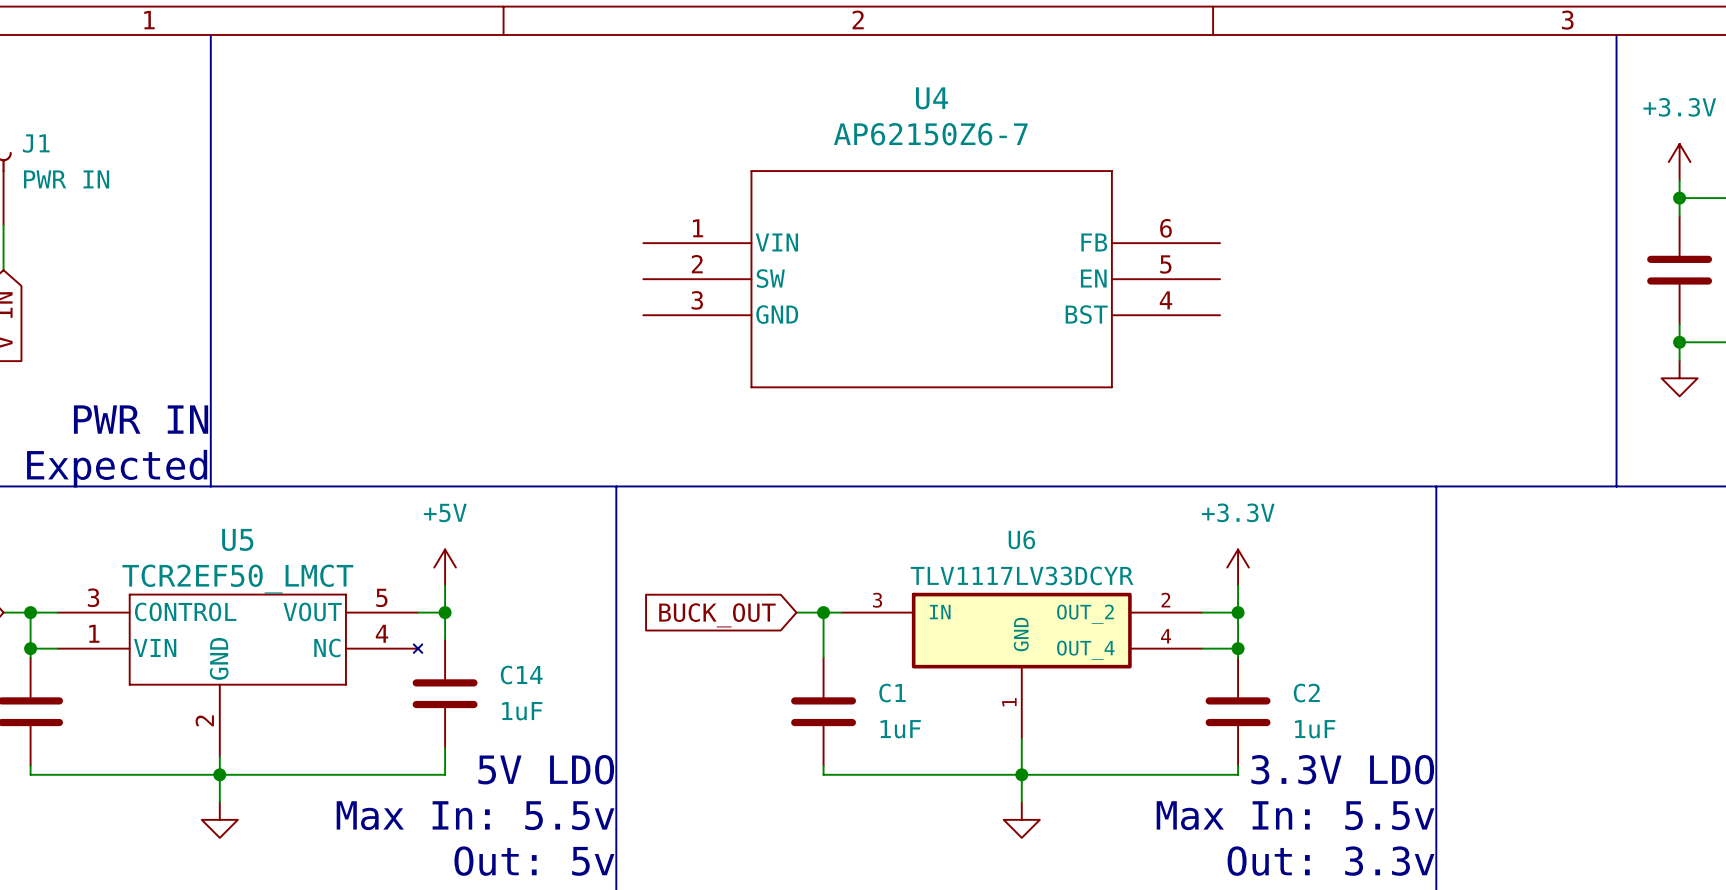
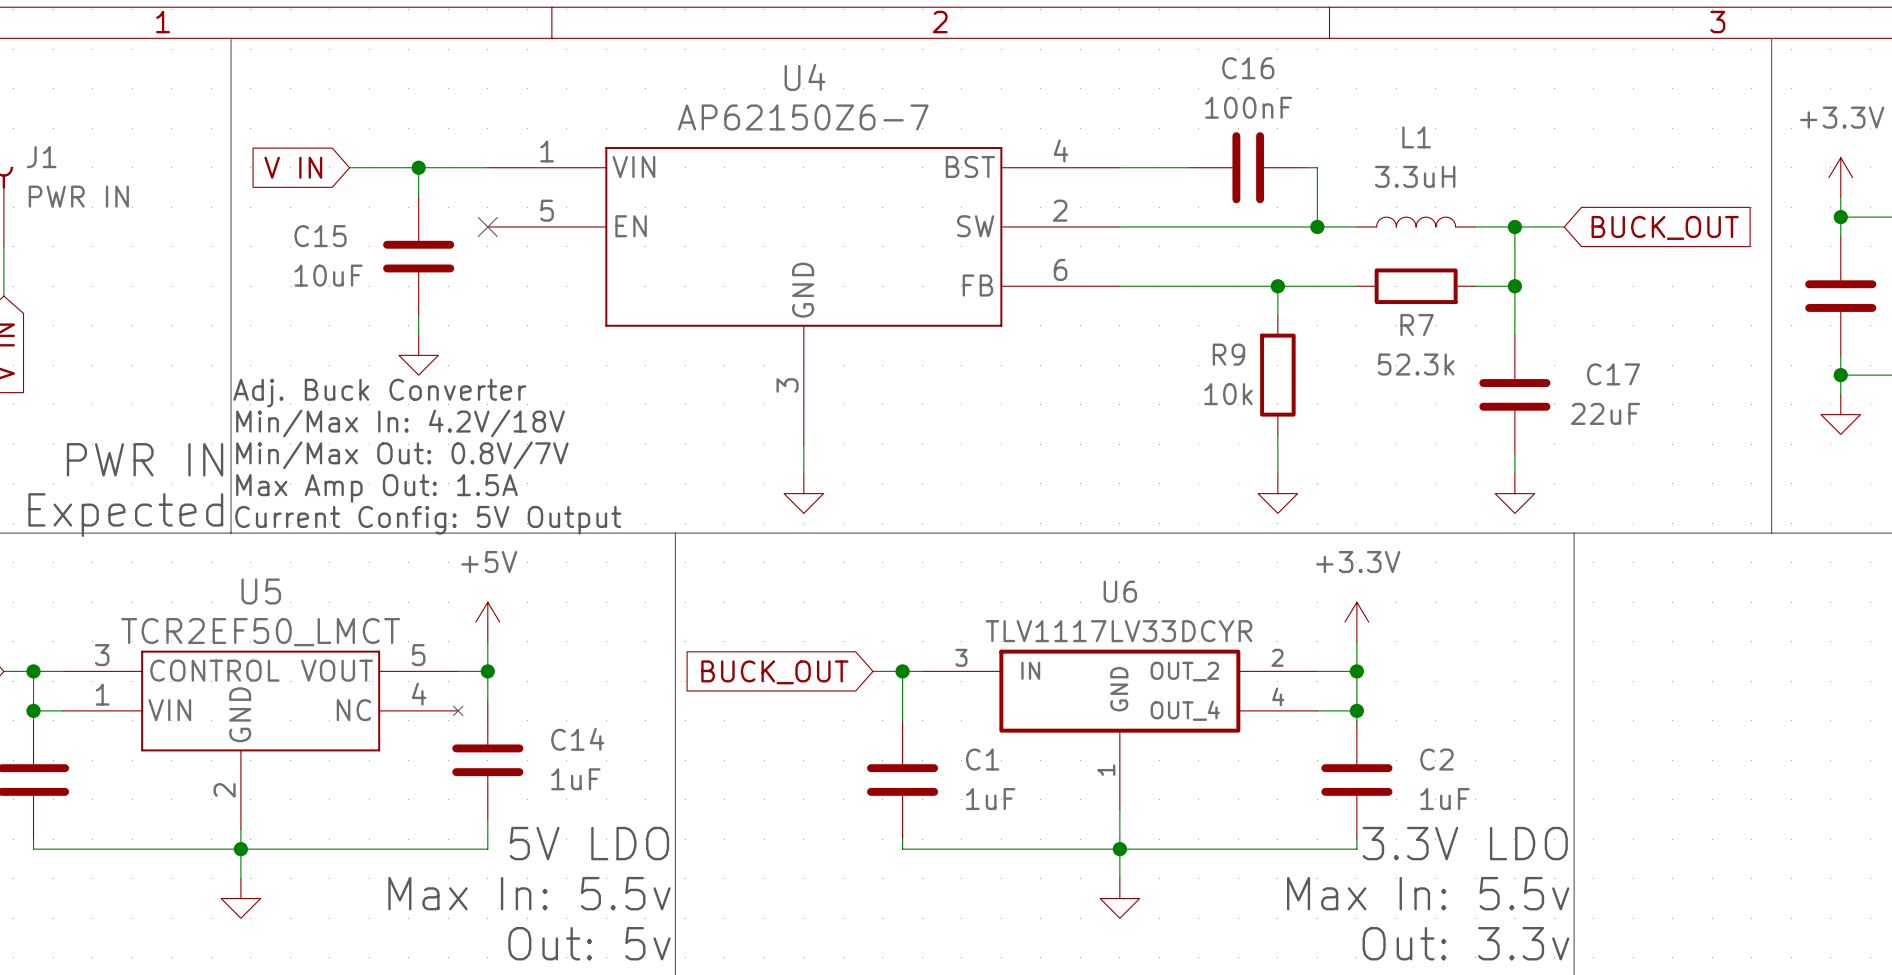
global label: none -> V IN (293, 167)
wire: none -> (349, 167) (487, 167)
wire: none -> (418, 167) (418, 197)
junction: none -> (418, 167)
wire: none -> (1119, 167) (1188, 167)
C16: none -> 100nF (1248, 167)
wire: none -> (1307, 167) (1317, 167) (1317, 226)
U4 symbol: [643, 170, 1221, 389] -> [487, 146, 1120, 445]
L1: none -> 3.3uH (1416, 222)
no-connect mark: none -> (487, 226)
wire: none -> (1119, 226) (1356, 226)
junction: none -> (1317, 226)
wire: none -> (1475, 226) (1564, 226)
wire: none -> (1514, 226) (1514, 335)
junction: none -> (1514, 226)
global label: none -> BUCK_OUT (1665, 227)
C15: none -> 10uF (418, 256)
wire: none -> (1119, 286) (1356, 286)
wire: none -> (1277, 286) (1277, 315)
junction: none -> (1277, 286)
R7: none -> 52.3k (1416, 286)
wire: none -> (1475, 286) (1514, 286)
junction: none -> (1514, 286)
wire: none -> (418, 315) (418, 335)
power symbol: none -> (418, 355)
R9: none -> 10k (1277, 375)
text: none -> Adj. Buck Converter (379, 393)
C17: none -> 22uF (1514, 394)
text: none -> Min/Max In: 4.2V/18V (400, 423)
wire: none -> (1277, 434) (1277, 473)
wire: none -> (803, 444) (803, 473)
text: none -> Min/Max Out: 0.8V/7V (402, 455)
wire: none -> (1514, 454) (1514, 473)
text: none -> Max Amp Out: 1.5A (376, 488)
power symbol: none -> (803, 493)
power symbol: none -> (1277, 493)
power symbol: none -> (1514, 493)
text: none -> Current Config: 5V Output (428, 520)

